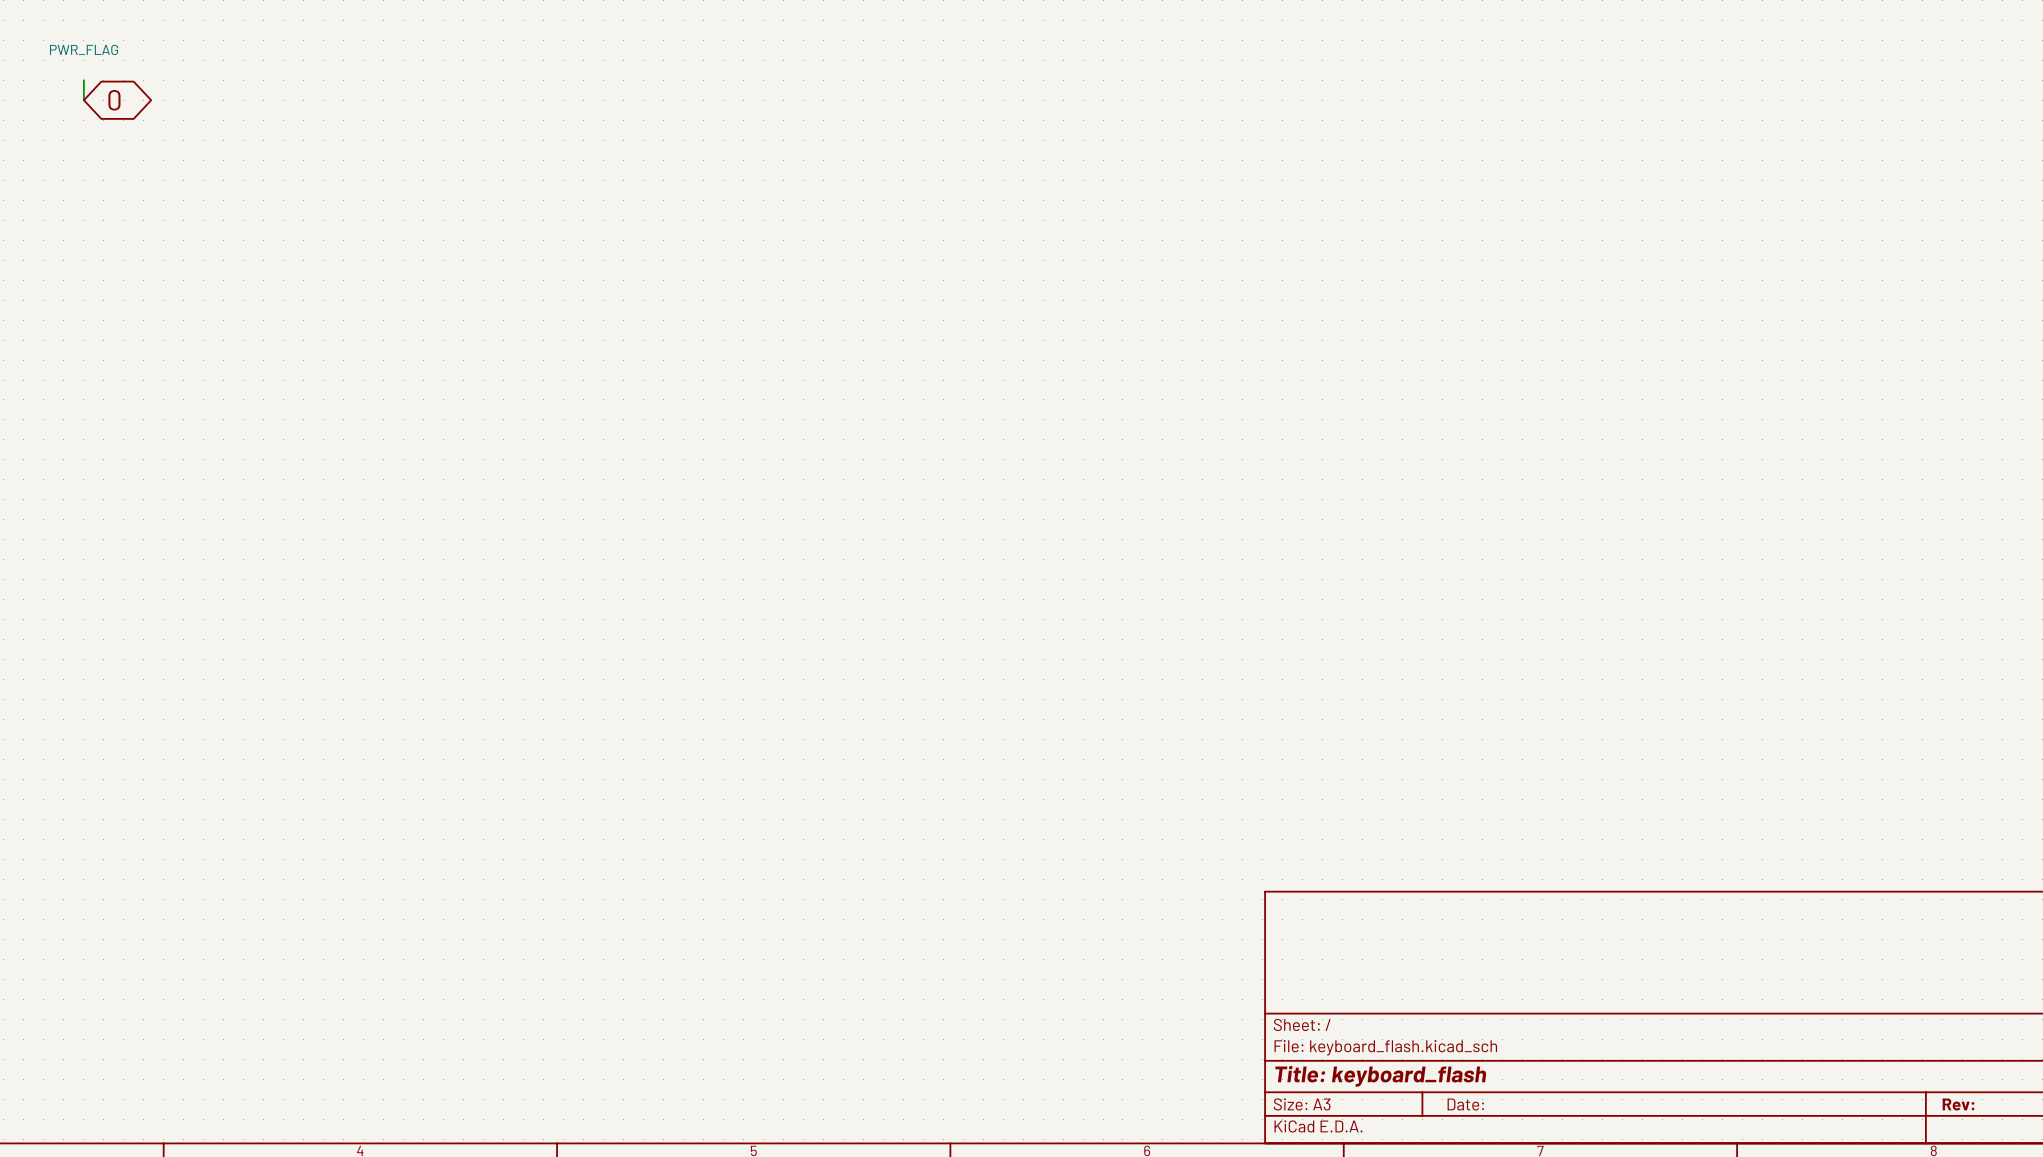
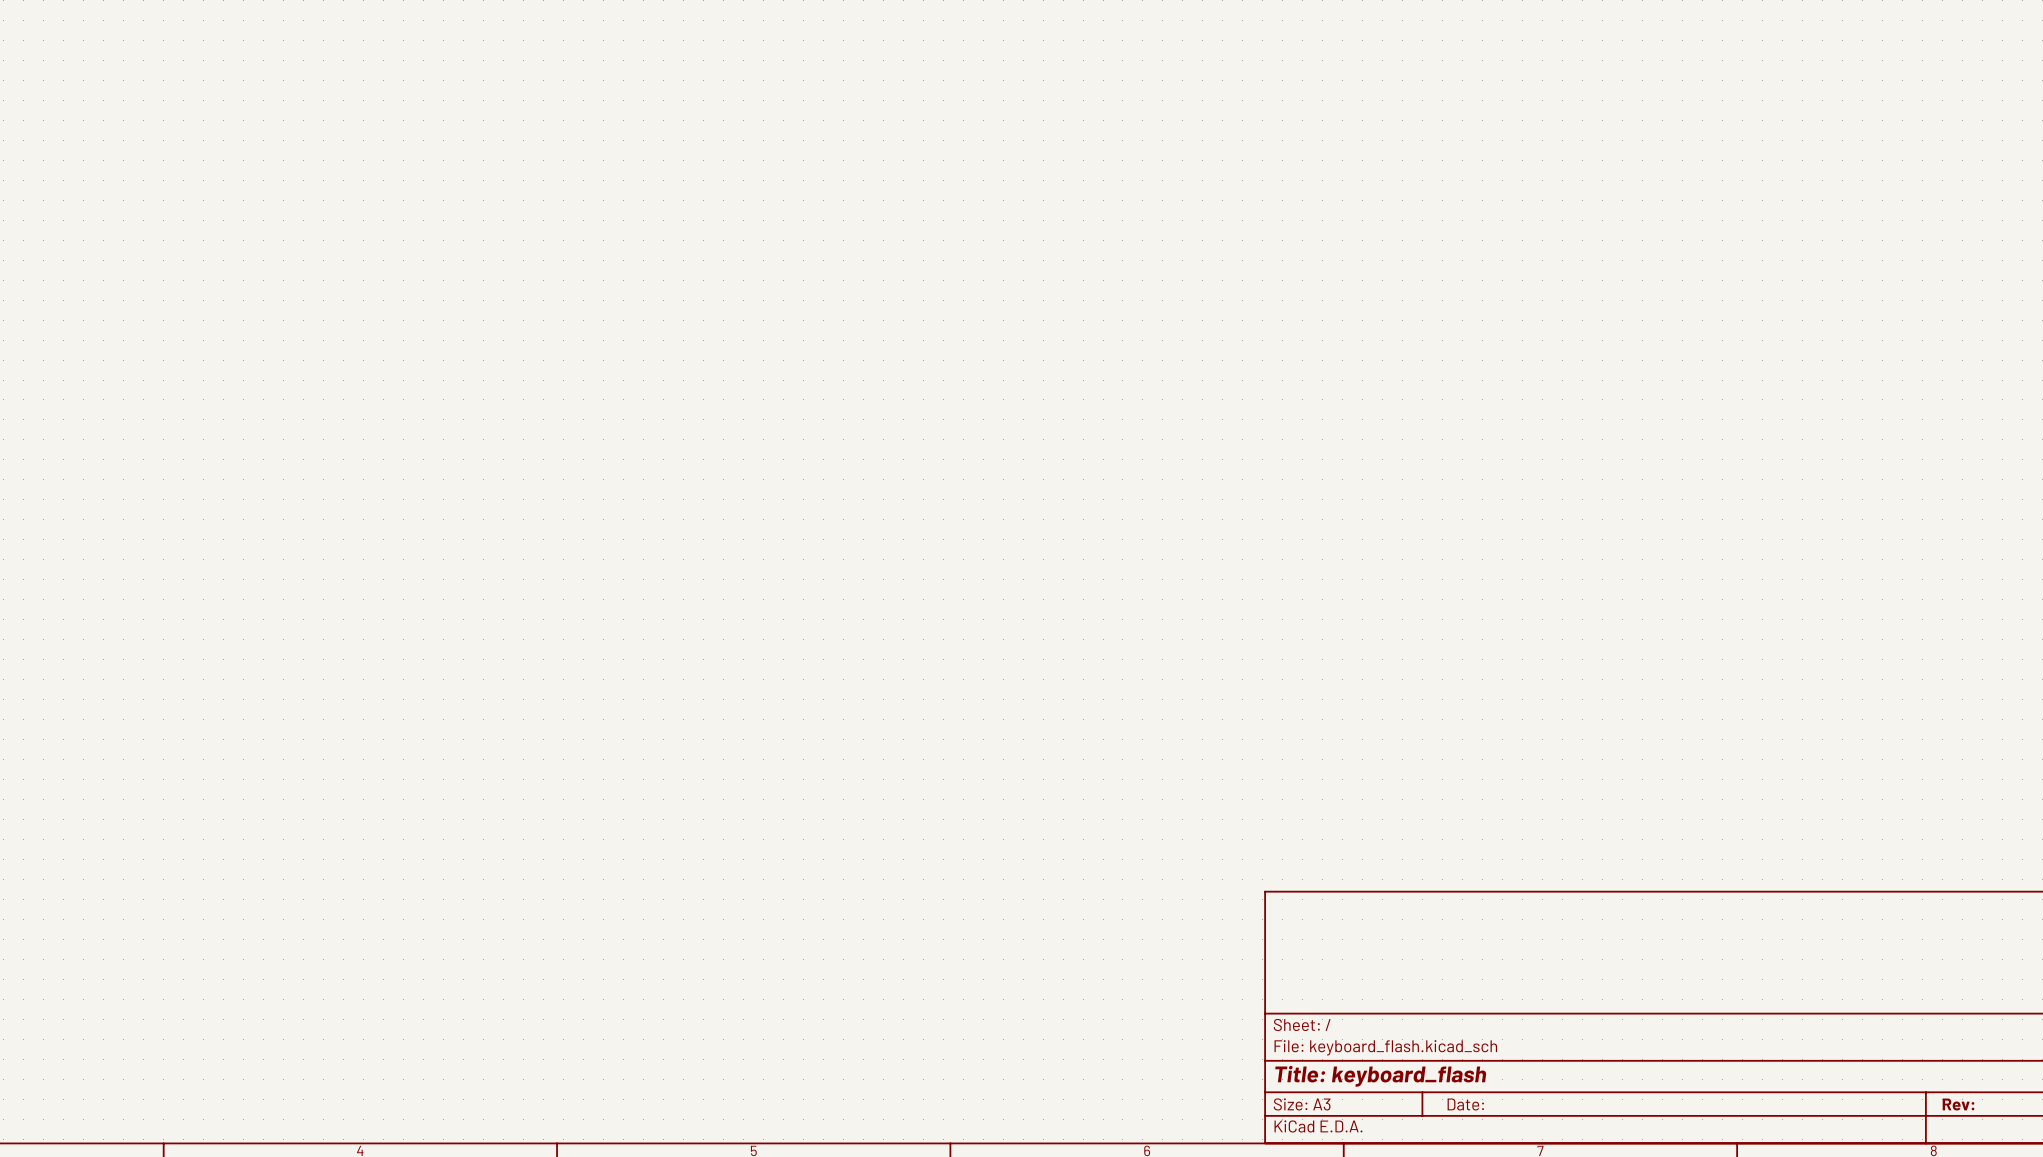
power symbol: PWR_FLAG (84, 49) -> none
wire: (83, 80) (83, 100) -> none
global label: 0 (114, 100) -> none

